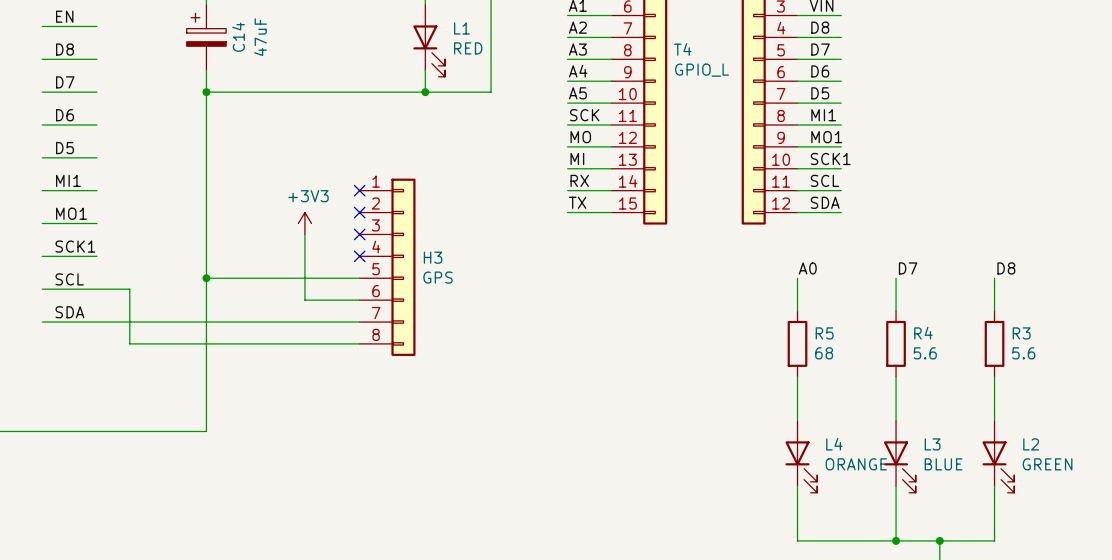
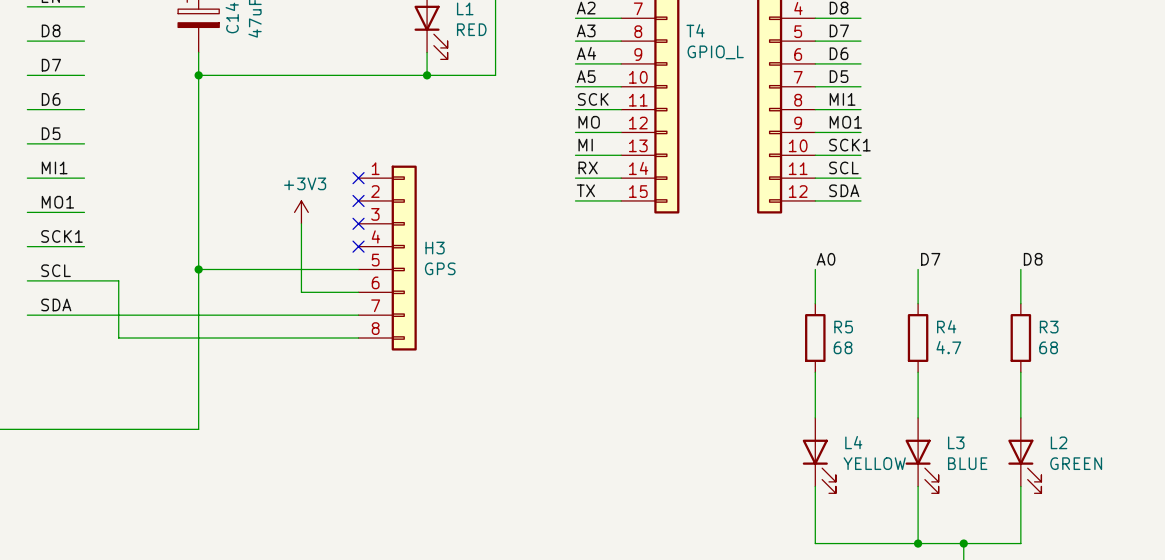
R4 value: 5.6 (925, 353) -> 4.7 (948, 347)
R3 value: 5.6 (1023, 353) -> 68 (1048, 347)
L4 value: ORANGE (856, 464) -> YELLOW (874, 463)

